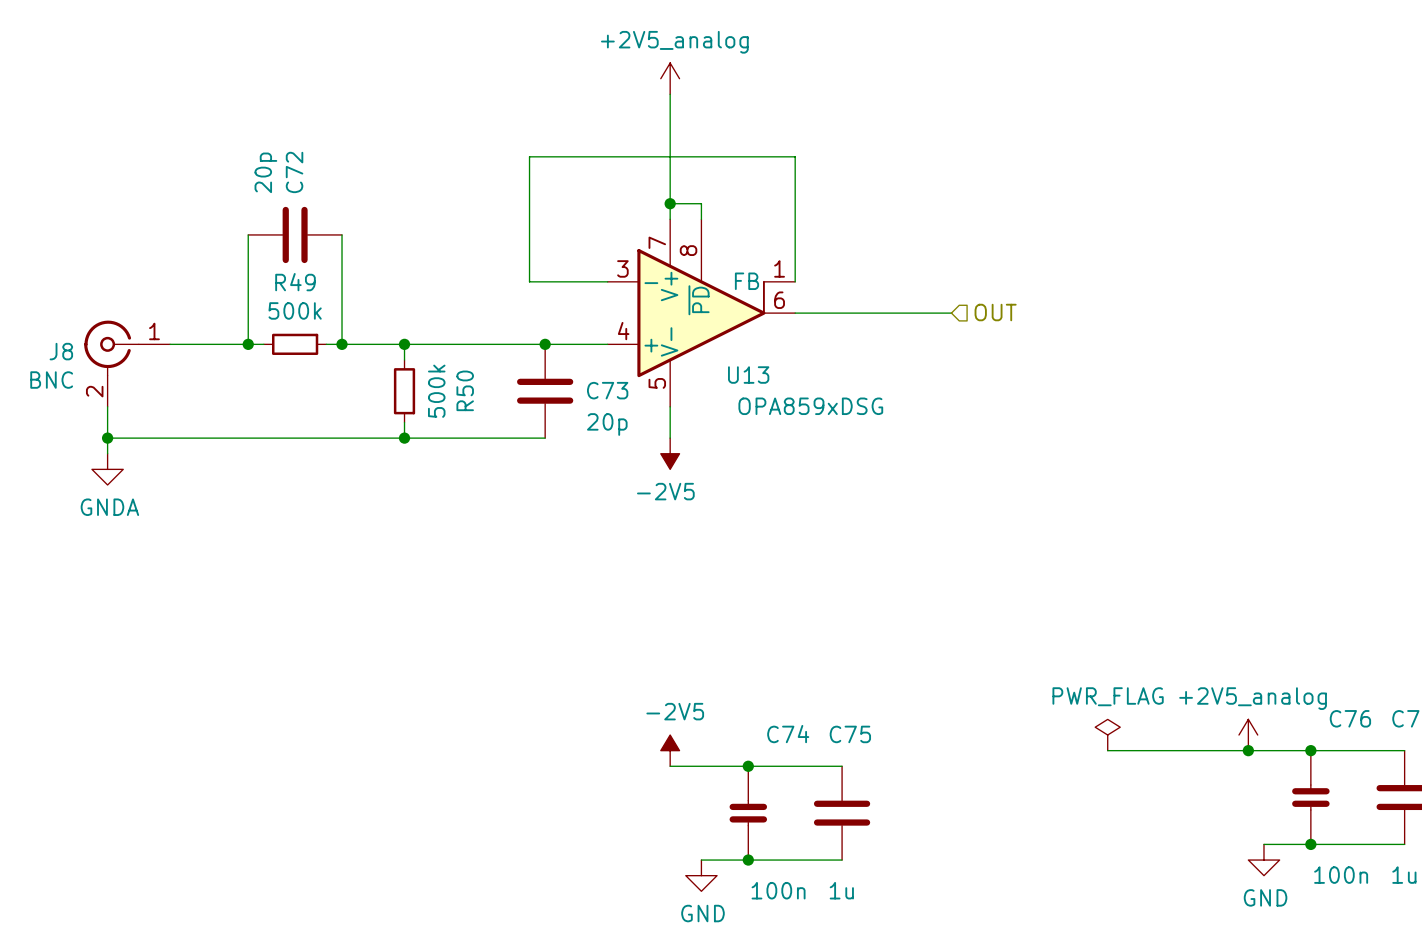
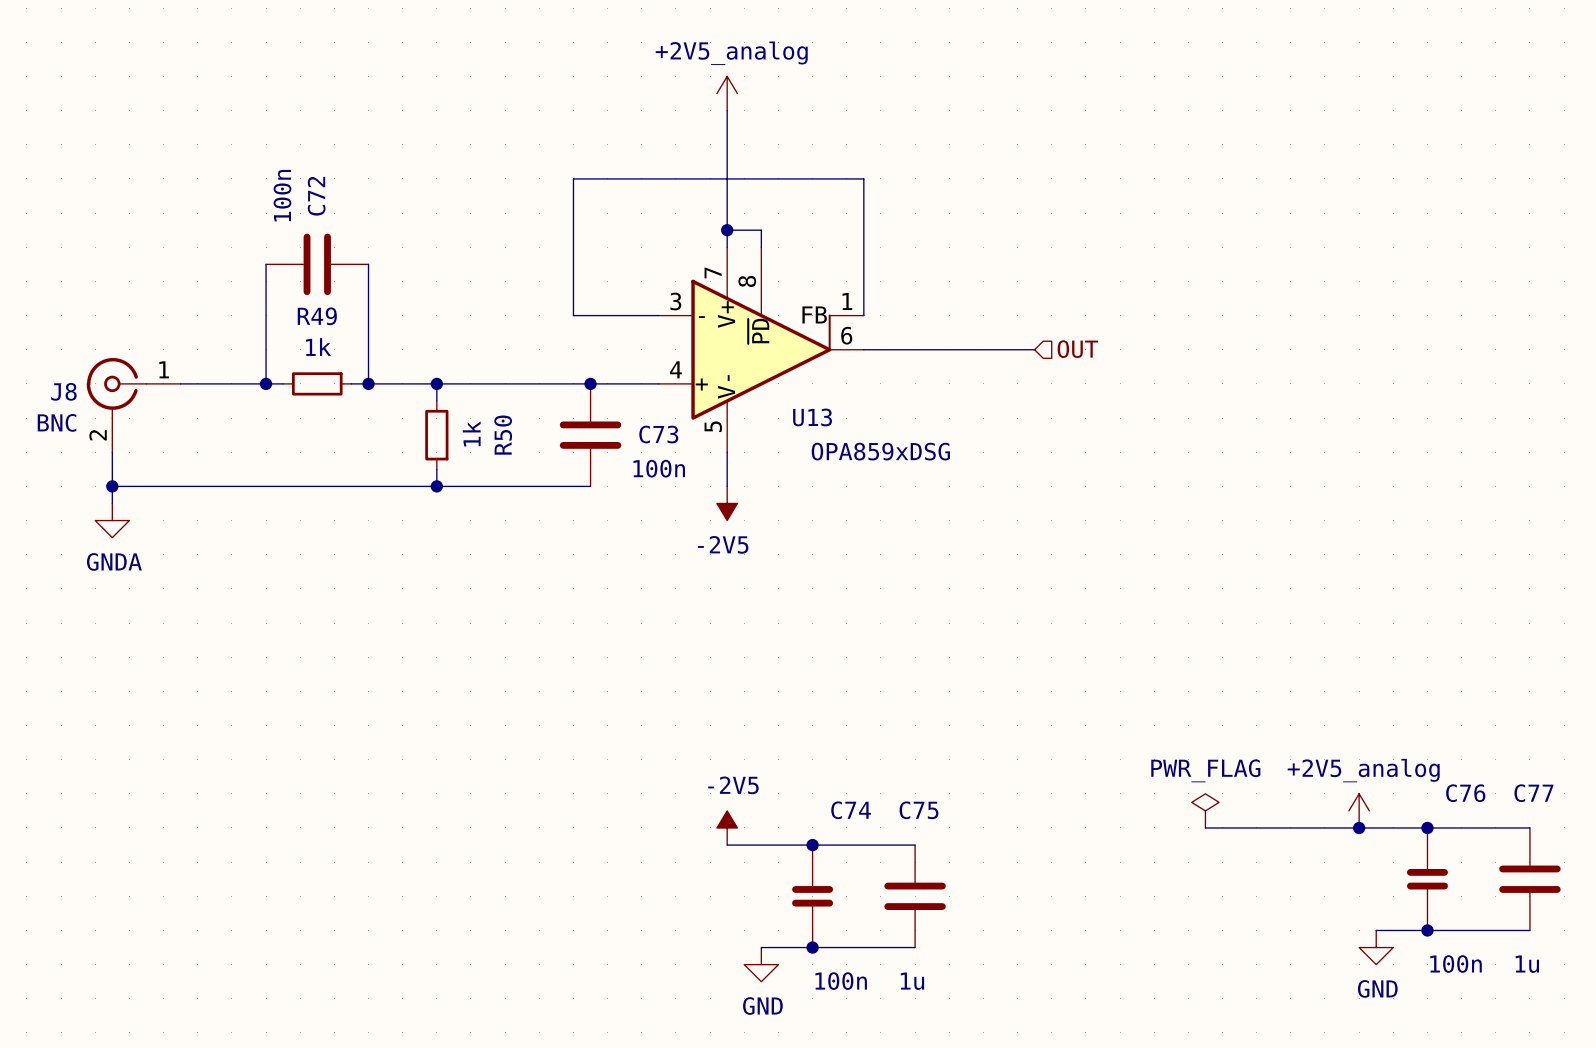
C72 value: 20p (265, 172) -> 100n (282, 195)
R49 value: 500k (295, 310) -> 1k (318, 347)
R50 value: 500k (436, 391) -> 1k (471, 433)
C73 value: 20p (607, 424) -> 100n (659, 468)

